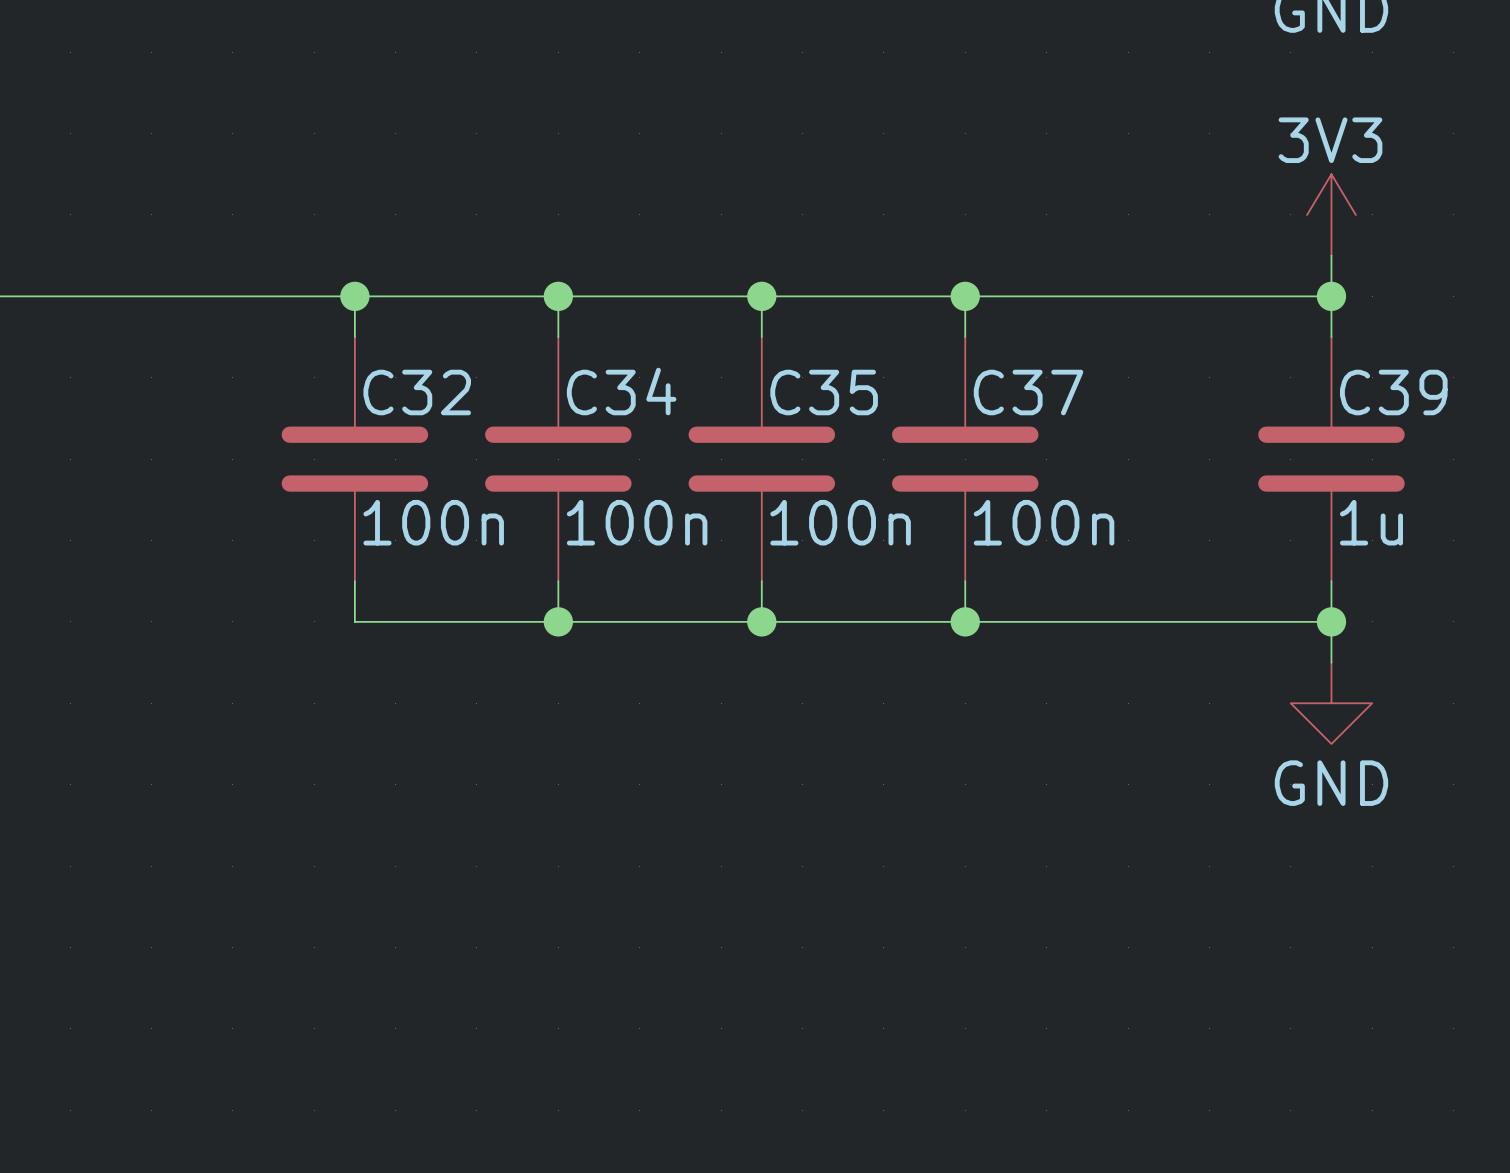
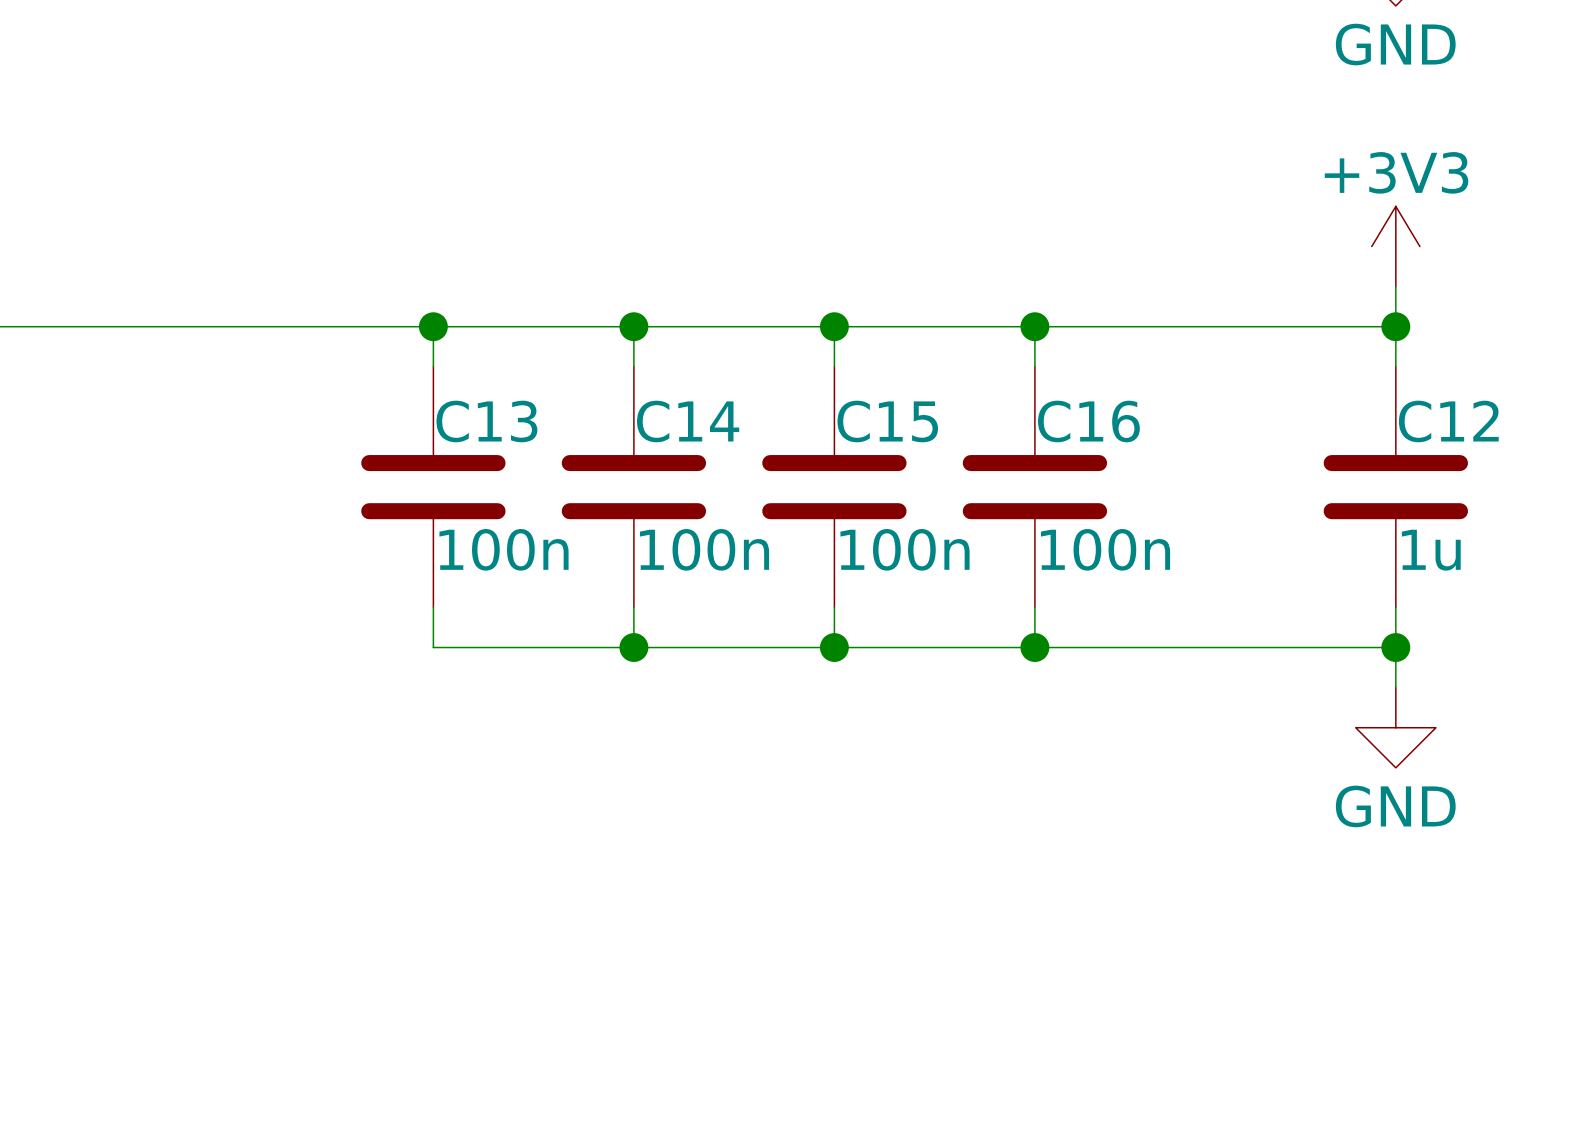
power symbol: 3V3 (1331, 214) -> +3V3 (1395, 246)
C34 name: C34 (621, 391) -> C14 (688, 421)
C32 name: C32 (417, 392) -> C13 (486, 421)
C35 name: C35 (824, 392) -> C15 (887, 421)
C37 name: C37 (1028, 392) -> C16 (1088, 421)
C39 name: C39 (1393, 392) -> C12 (1448, 421)

